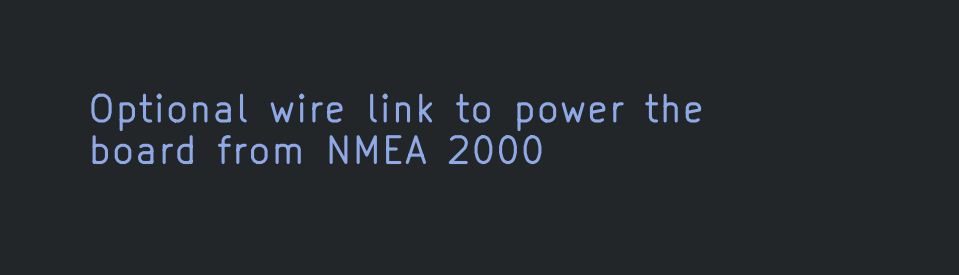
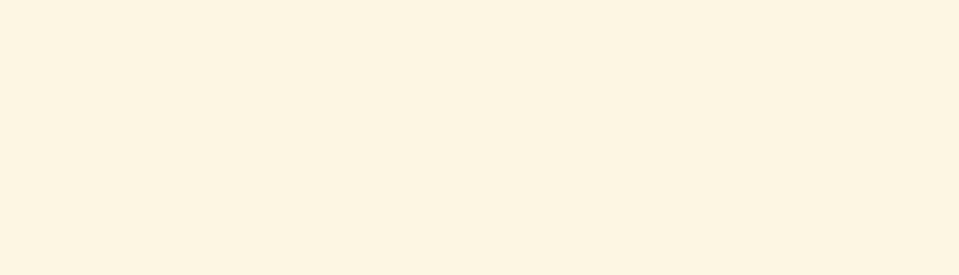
text: Optional wire link to power the (396, 112) -> none
text: board from NMEA 2000 (317, 149) -> none

